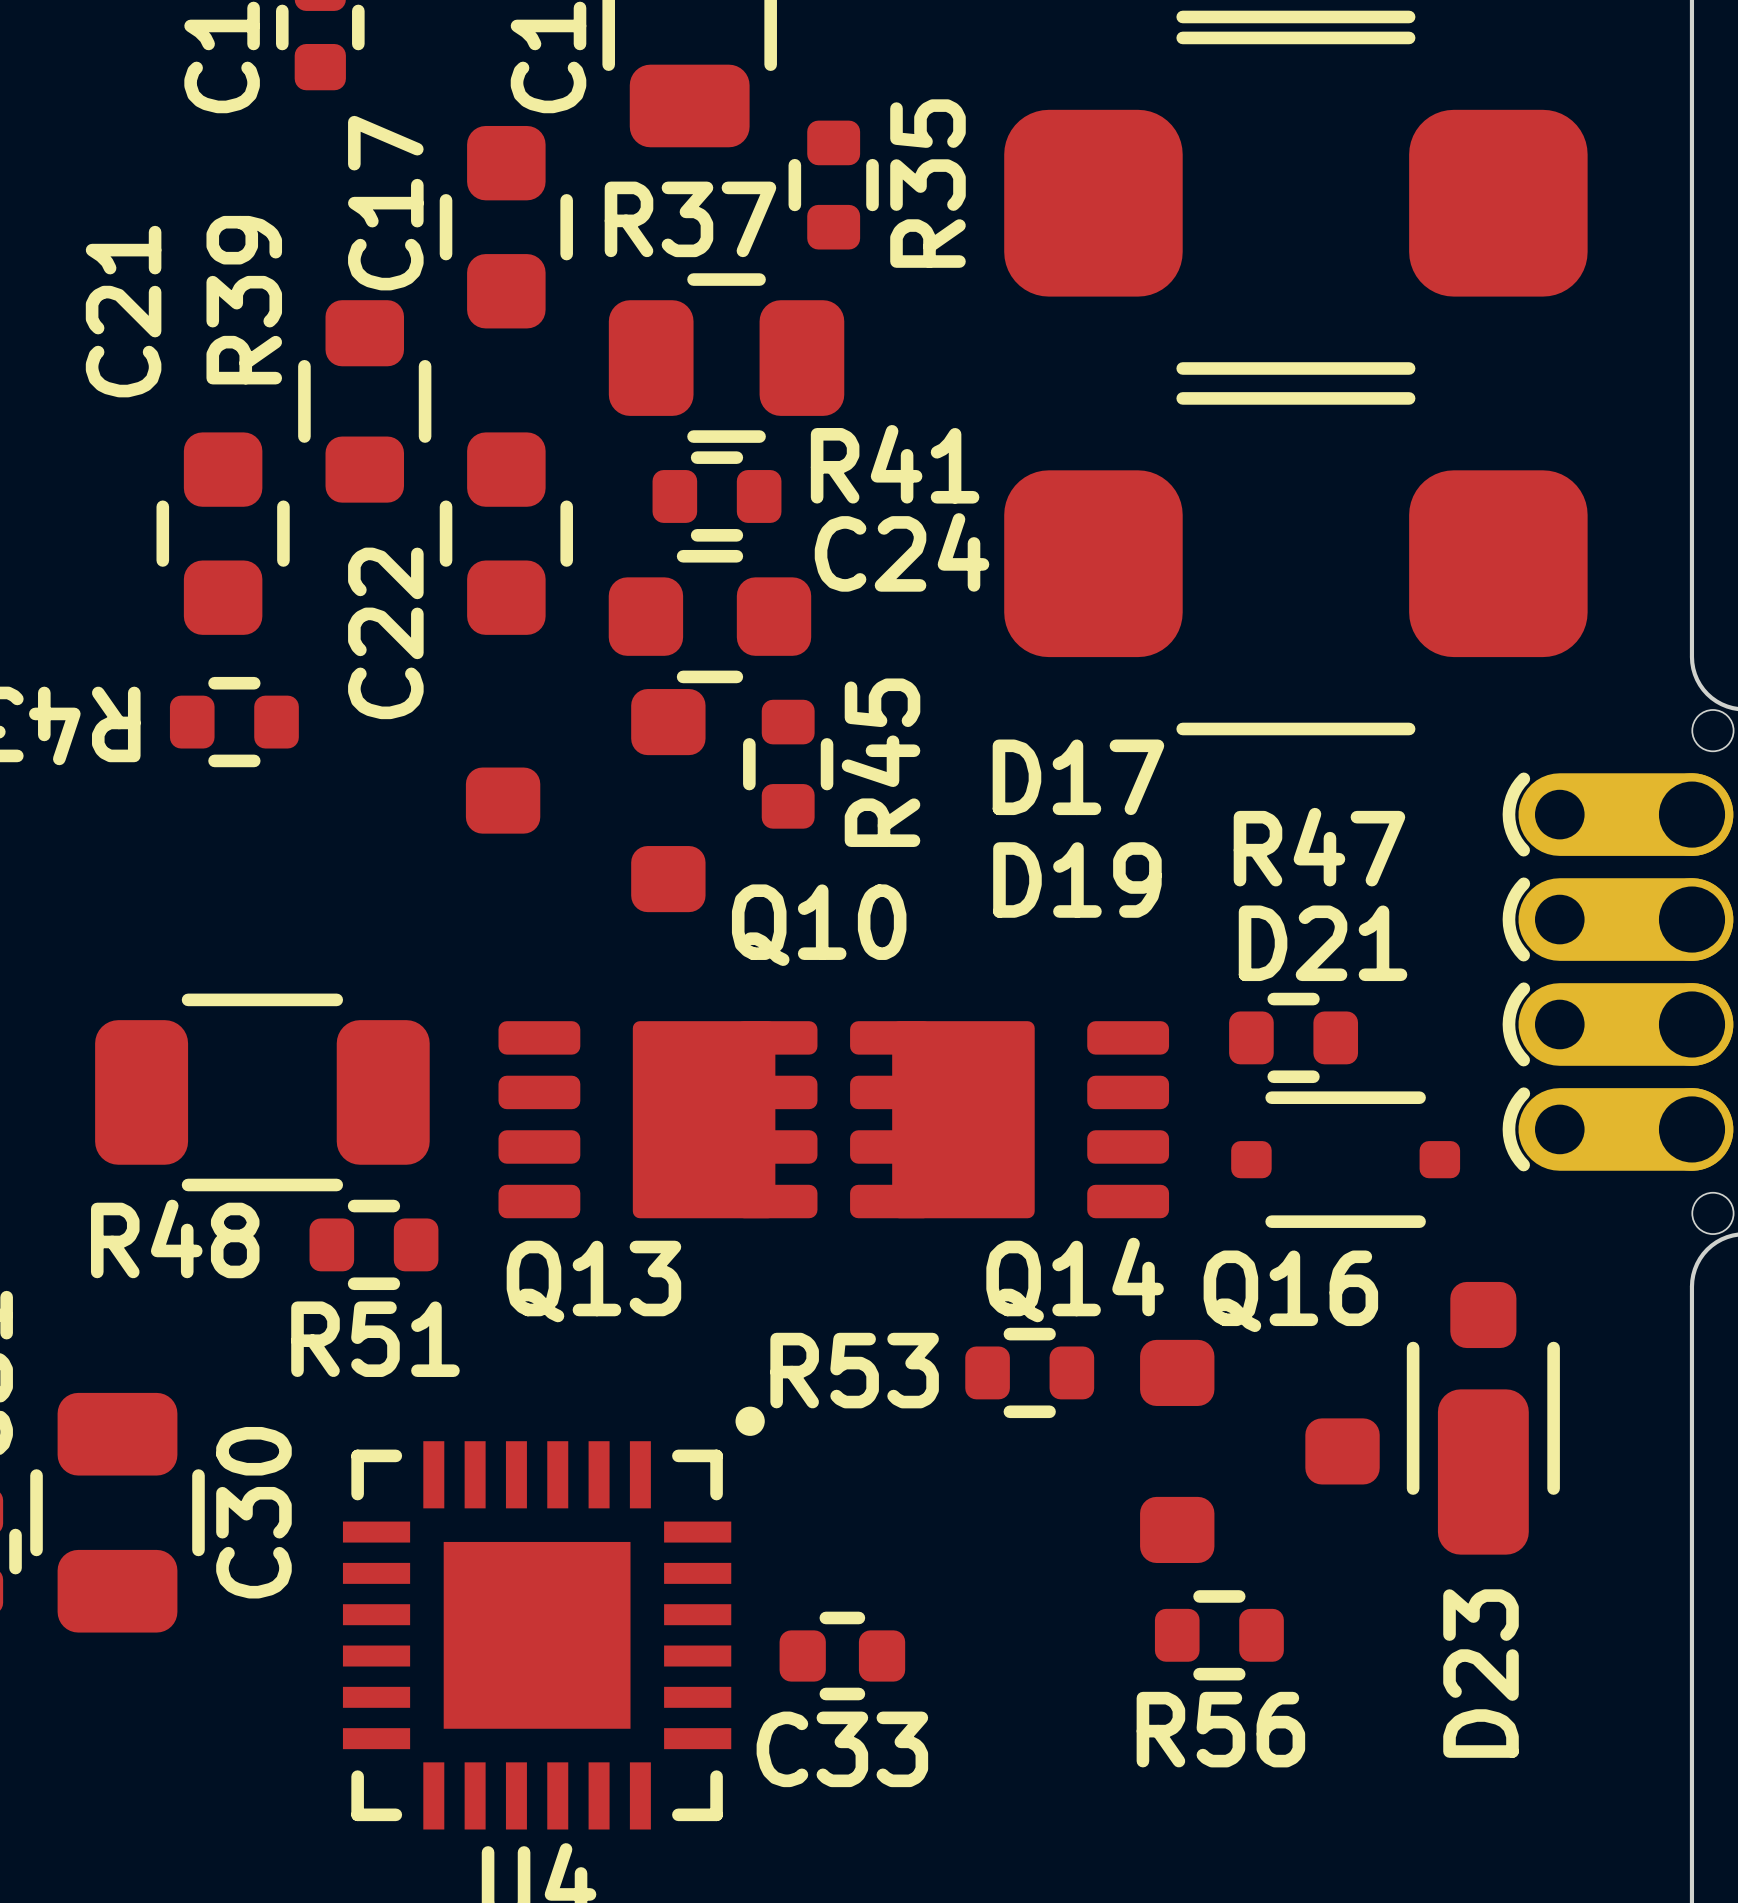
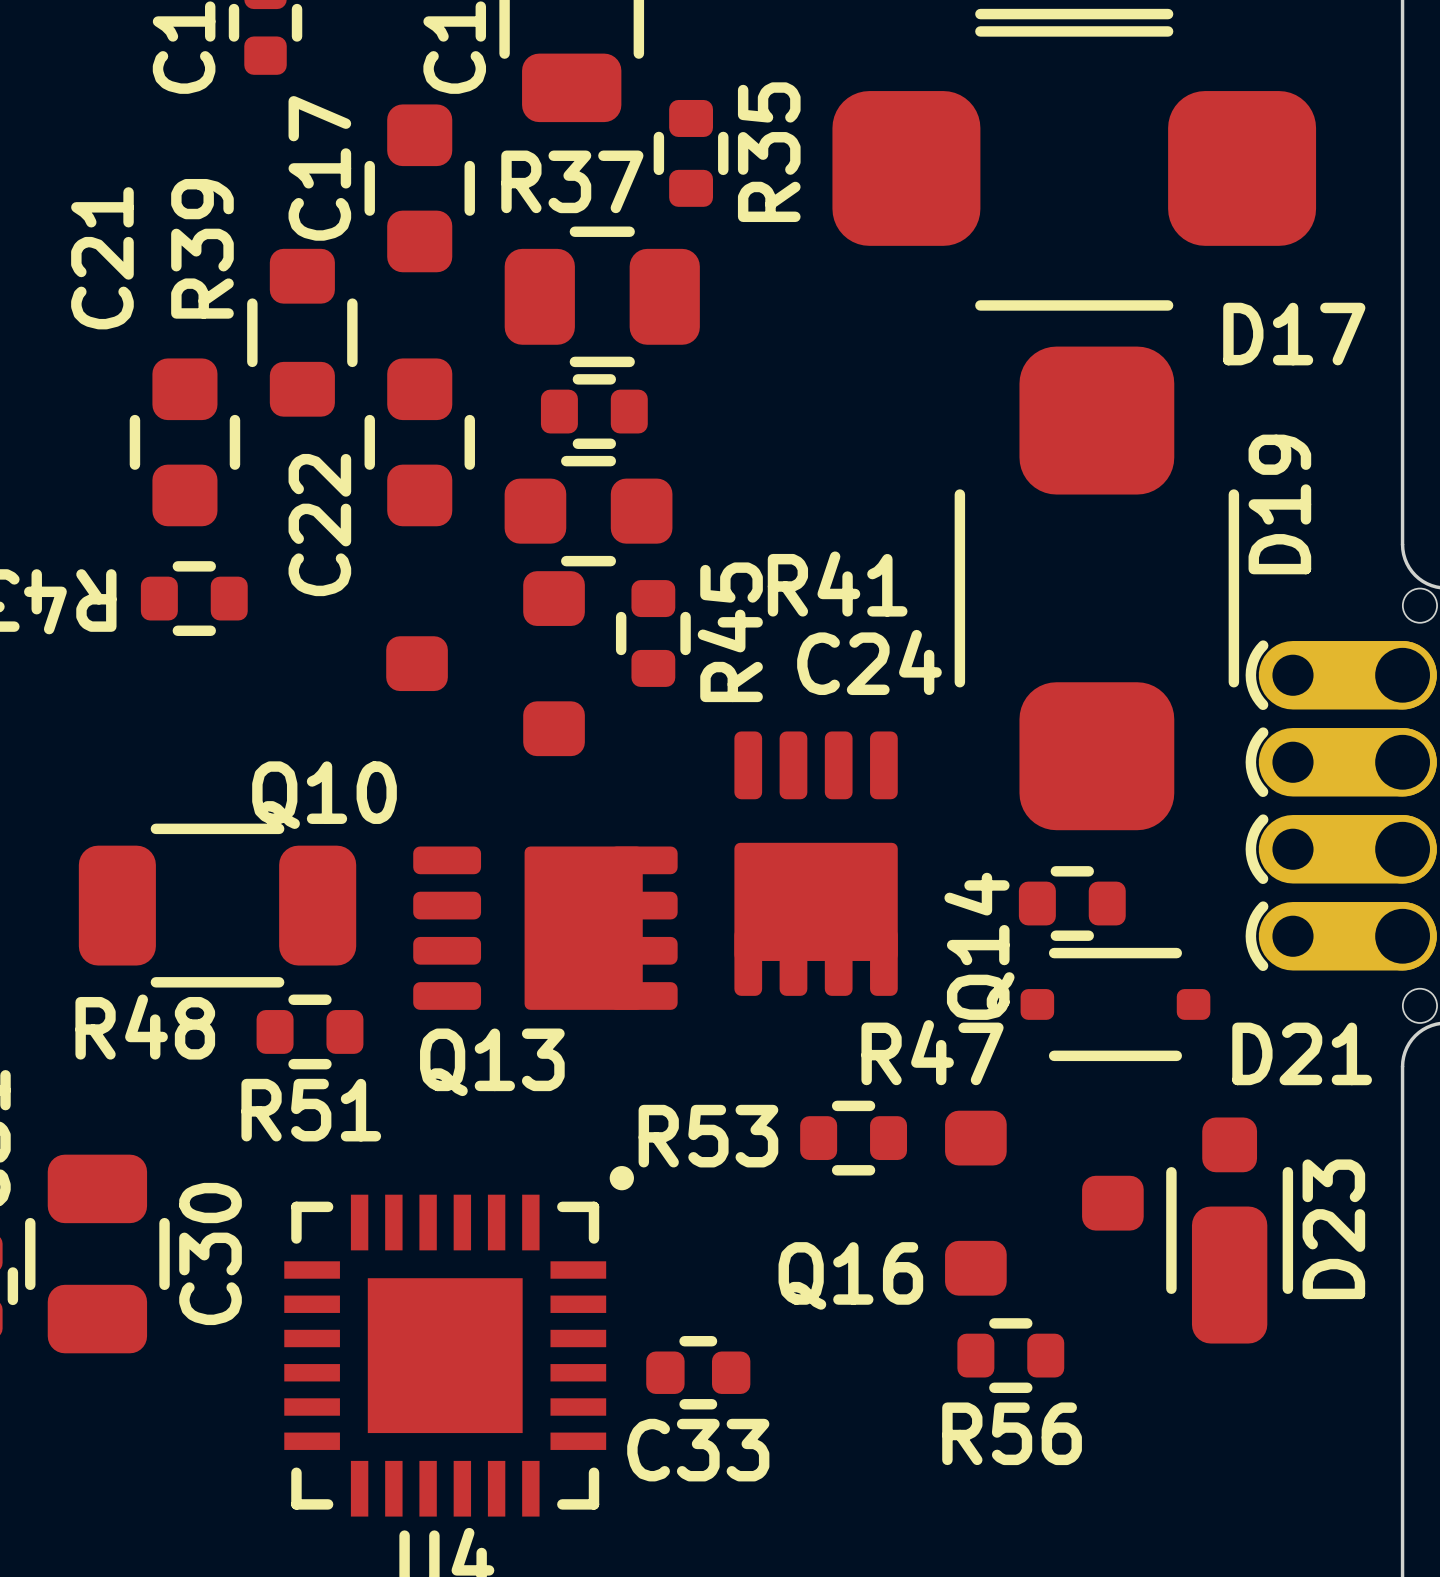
R41 name position: R41 (895, 464) -> R41 (837, 584)
C24 name position: C24 (902, 552) -> C24 (869, 662)
D19 rotation: 0° (1295, 563) -> 90° clockwise (1096, 588)
D17 name position: D17 (1078, 777) -> D17 (1294, 334)
R47 name position: R47 (1319, 847) -> R47 (932, 1052)
D19 name position: D19 (1077, 880) -> D19 (1279, 504)
Q10 name position: Q10 (819, 925) -> Q10 (324, 795)
D21 name position: D21 (1323, 943) -> D21 (1302, 1053)
R47 position: (1293, 1037) -> (1072, 903)
Q14 rotation: 0° (1009, 1119) -> 90° counterclockwise (816, 863)
D21 position: (1345, 1159) -> (1115, 1004)
Q16 name position: Q16 (1290, 1291) -> Q16 (850, 1275)
D23 position: (1483, 1418) -> (1229, 1230)
D23 name position: D23 (1481, 1673) -> D23 (1333, 1229)

